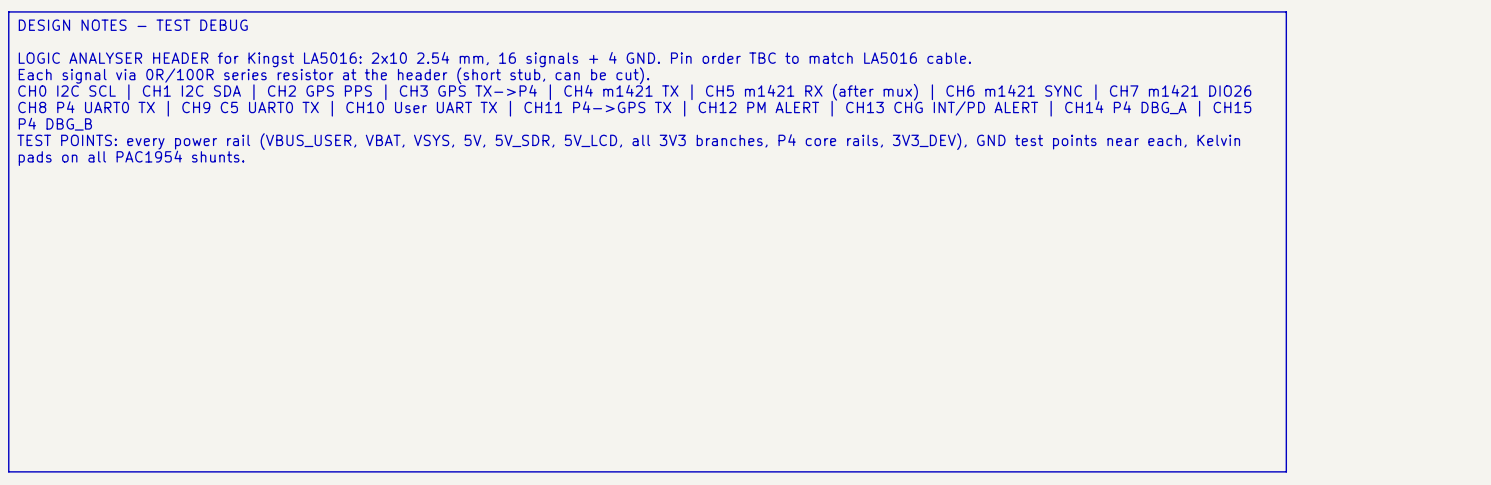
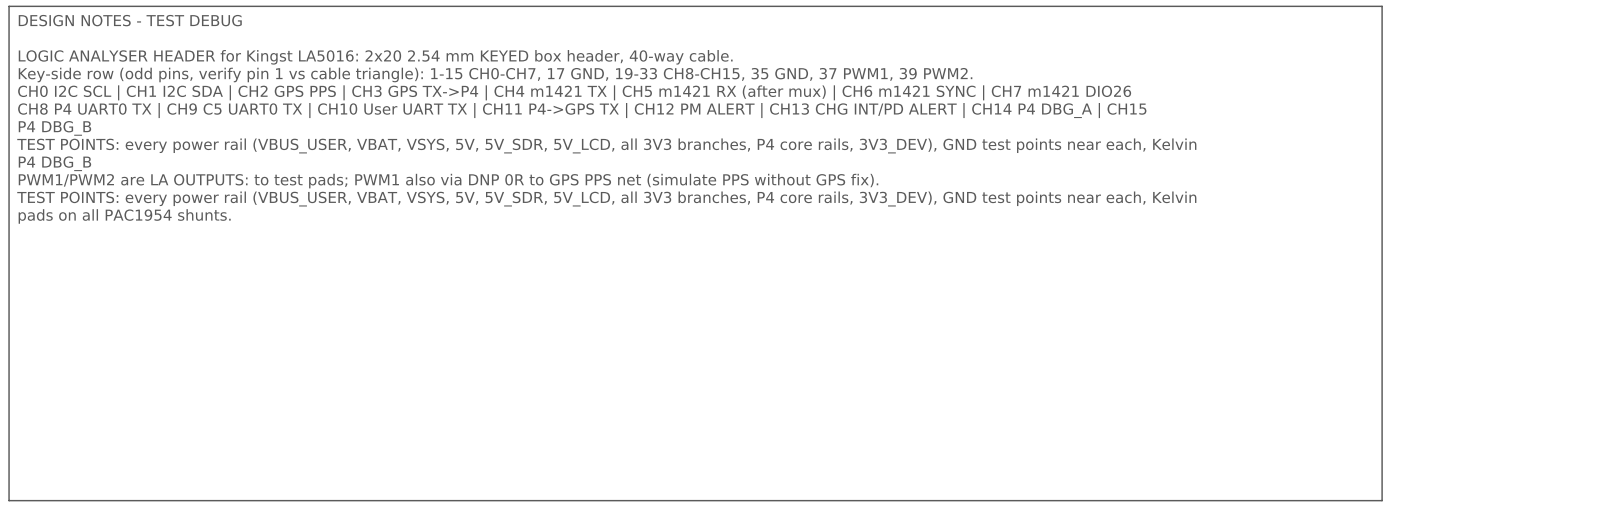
text: LOGIC ANALYSER HEADER for Kingst LA5016: 2x10 2.54 mm, 16 signals + 4 GND. Pin order TBC to match LA5016 cable. (494, 59) -> LOGIC ANALYSER HEADER for Kingst LA5016: 2x20 2.54 mm KEYED box header, 40-way cable. (375, 57)
text: Each signal via 0R/100R series resistor at the header (short stub, can be cut). (334, 75) -> Key-side row (odd pins, verify pin 1 vs cable triangle): 1-15 CH0-CH7, 17 GND, 19-33 CH8-CH15, 35 GND, 37 PWM1, 39 PWM2. (495, 74)
text: pads on all PAC1954 shunts. (131, 158) -> P4 DBG_B (54, 163)
text: none -> PWM1/PWM2 are LA OUTPUTS: to test pads; PWM1 also via DNP 0R to GPS PPS net (simulate PPS without GPS fix). (448, 181)
text: none -> TEST POINTS: every power rail (VBUS_USER, VBAT, VSYS, 5V, 5V_SDR, 5V_LCD, all 3V3 branches, P4 core rails, 3V3_DEV), GND test points near each, Kelvin (606, 198)
text: none -> pads on all PAC1954 shunts. (124, 216)

